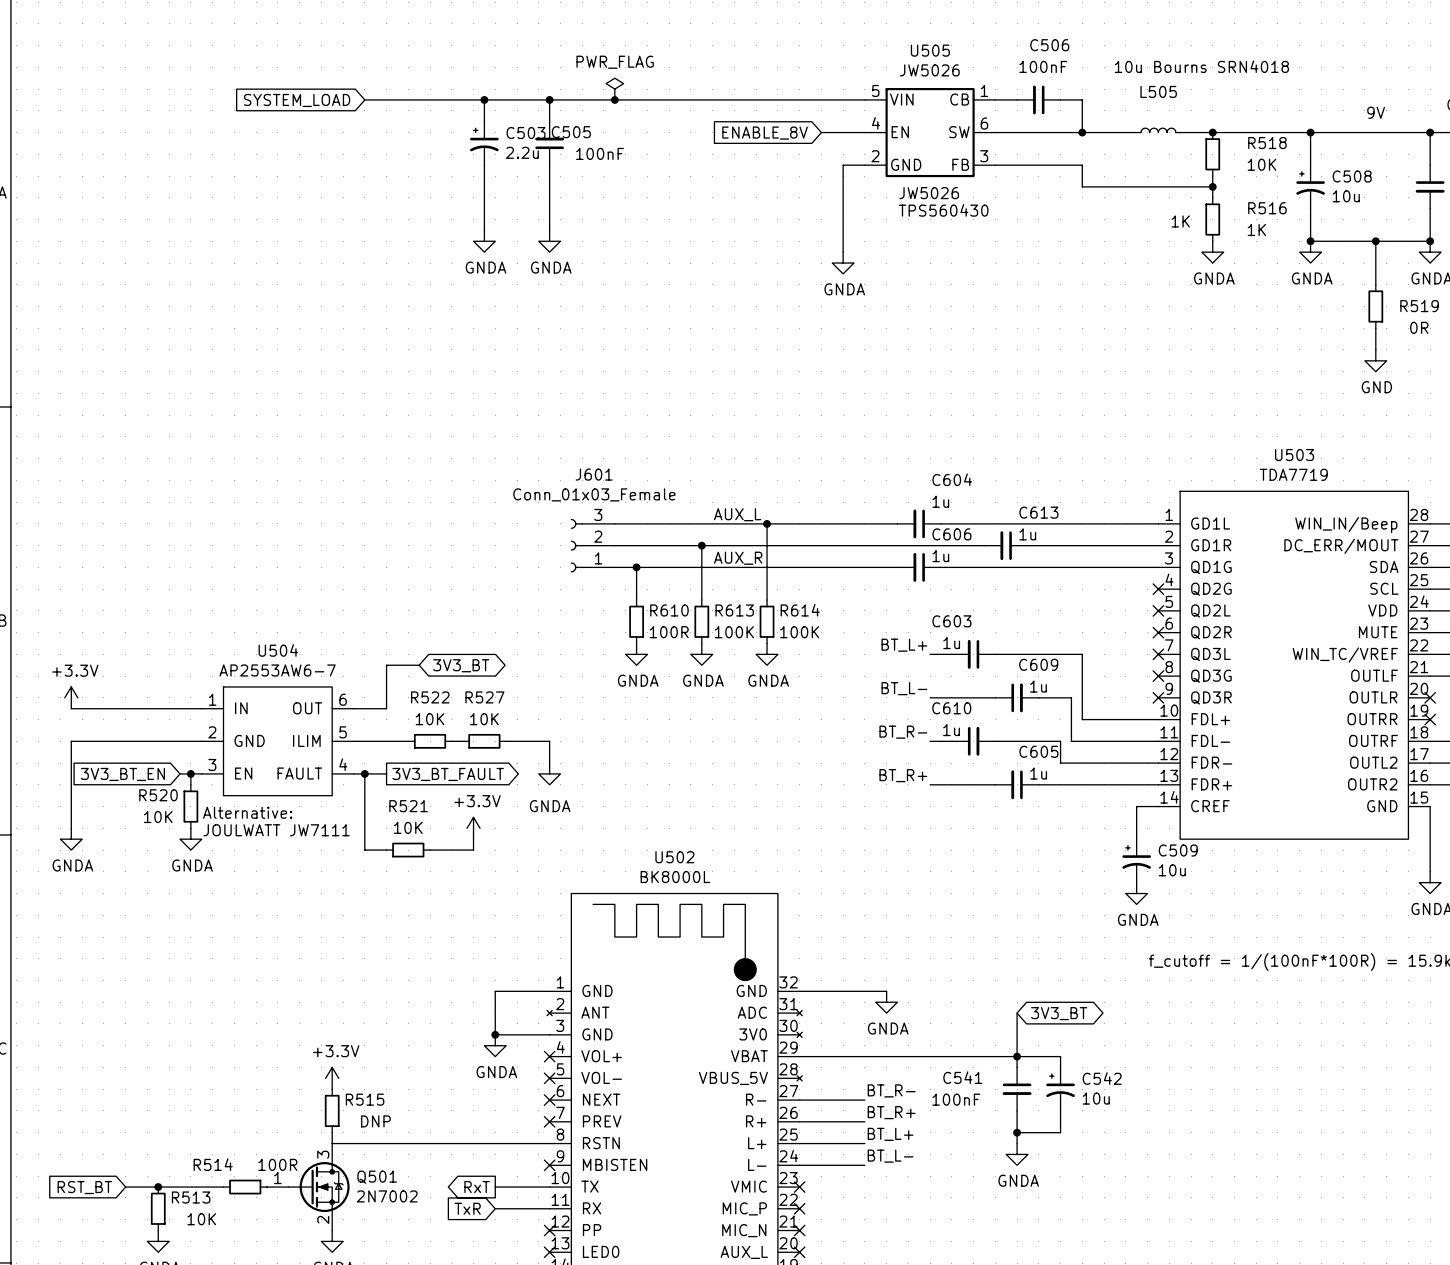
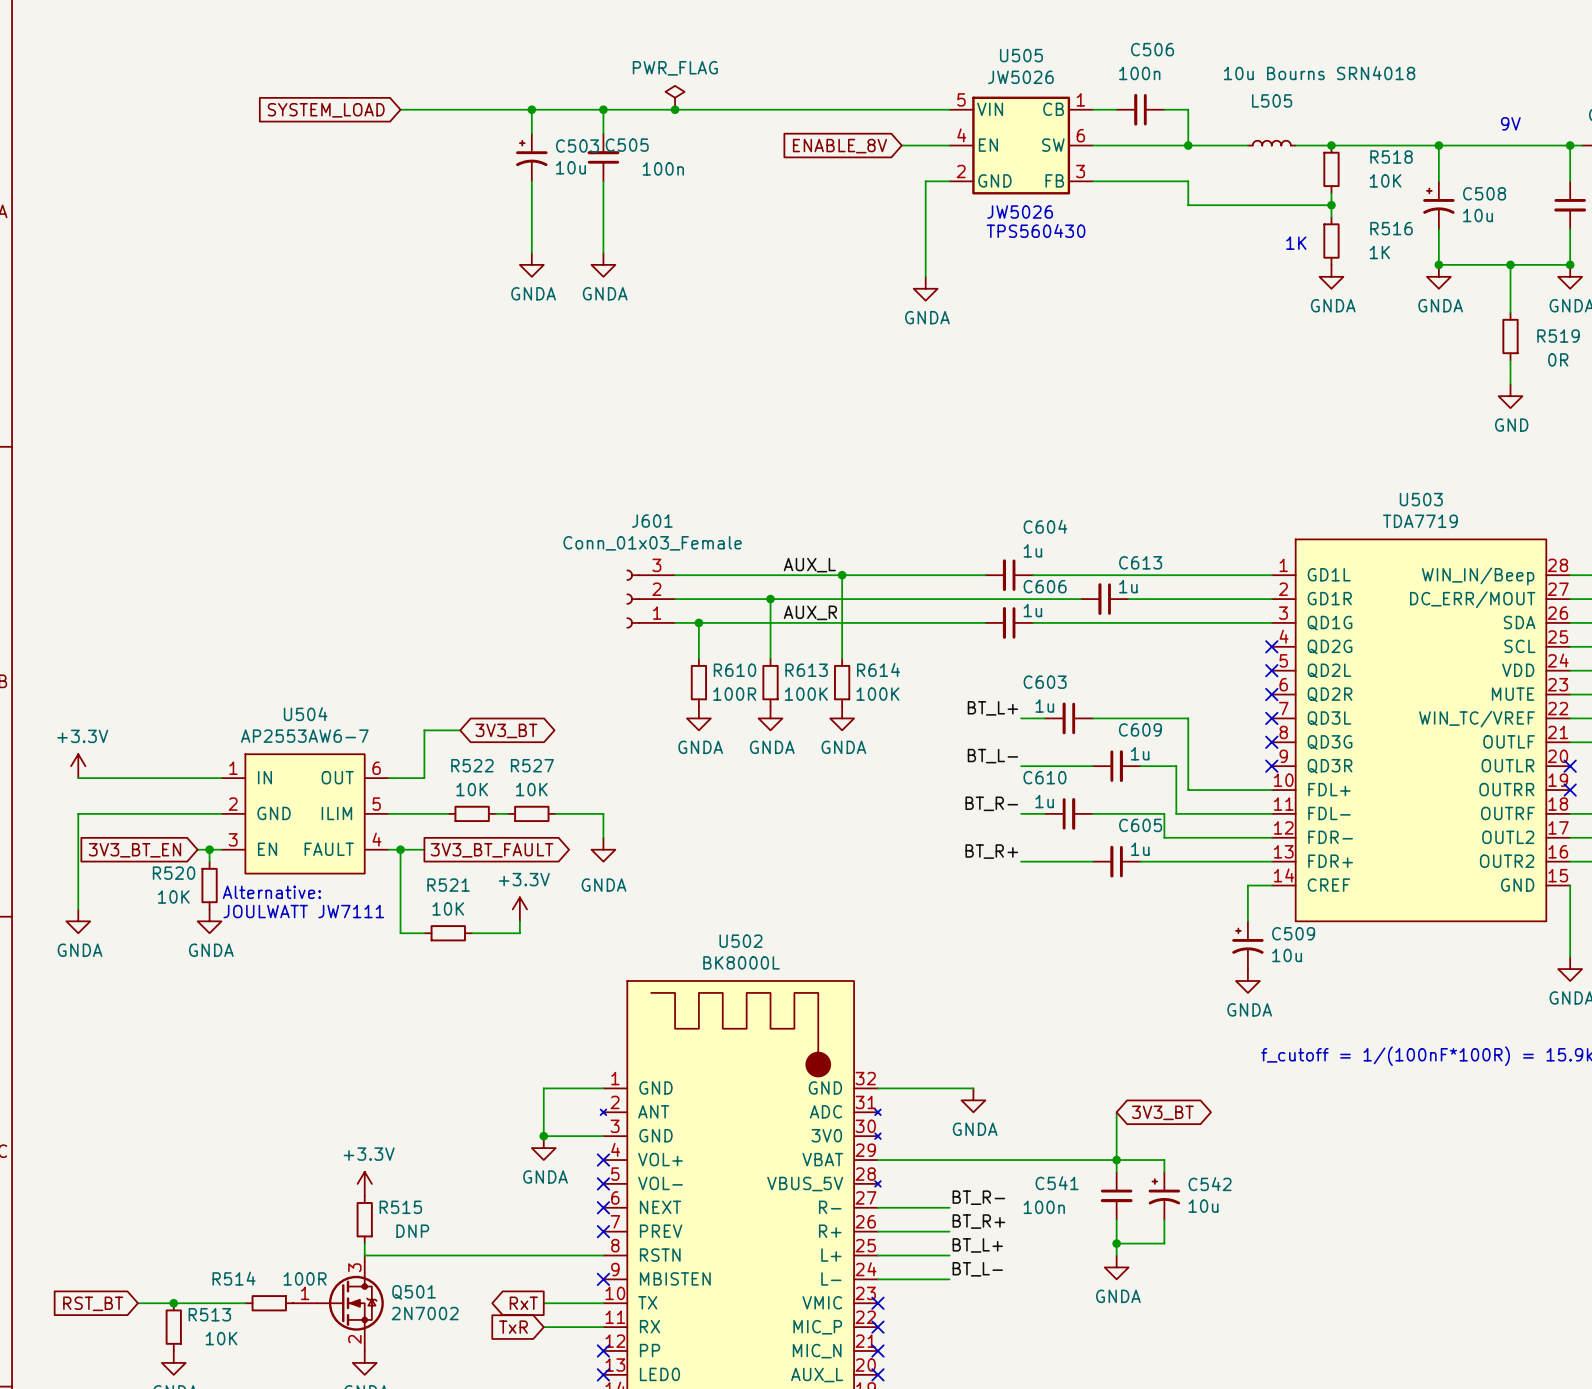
C506 value: 100nF (1043, 66) -> 100n (1139, 73)
C503 value: 2.2u (522, 152) -> 10u (570, 167)
C505 value: 100nF (600, 153) -> 100n (663, 168)
C541 value: 100nF (956, 1099) -> 100n (1044, 1207)

